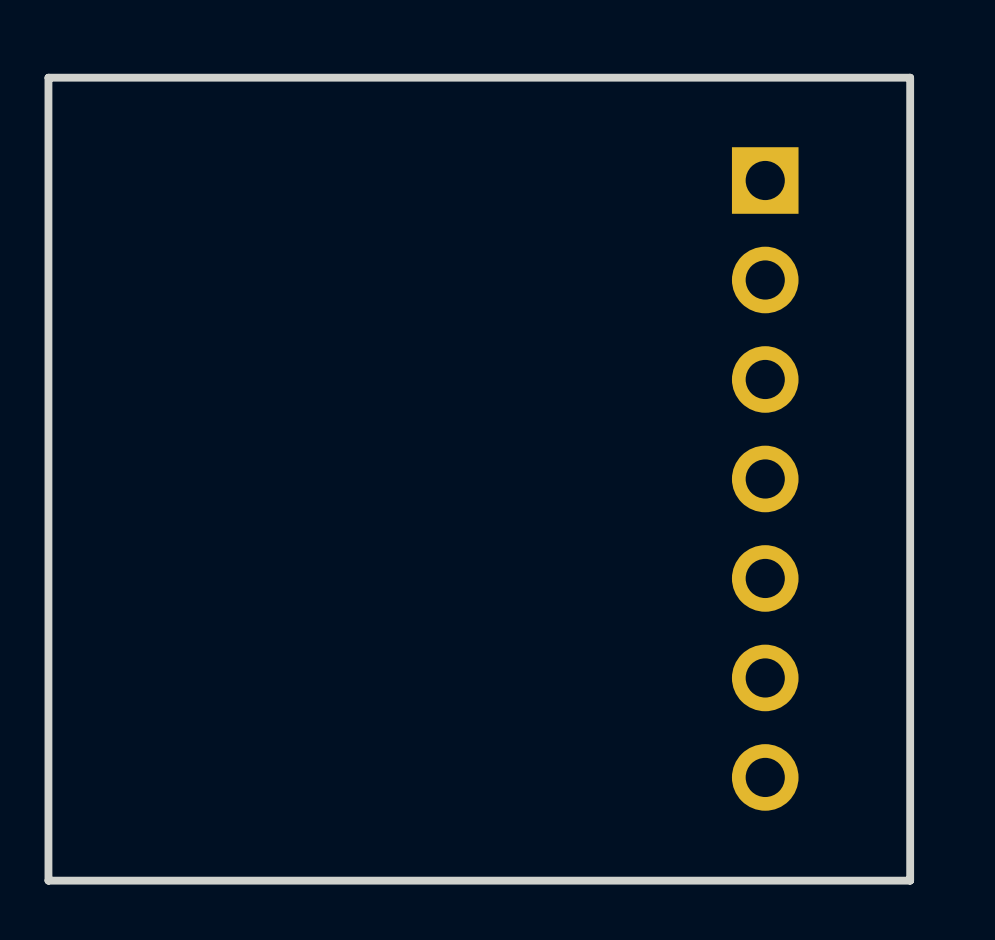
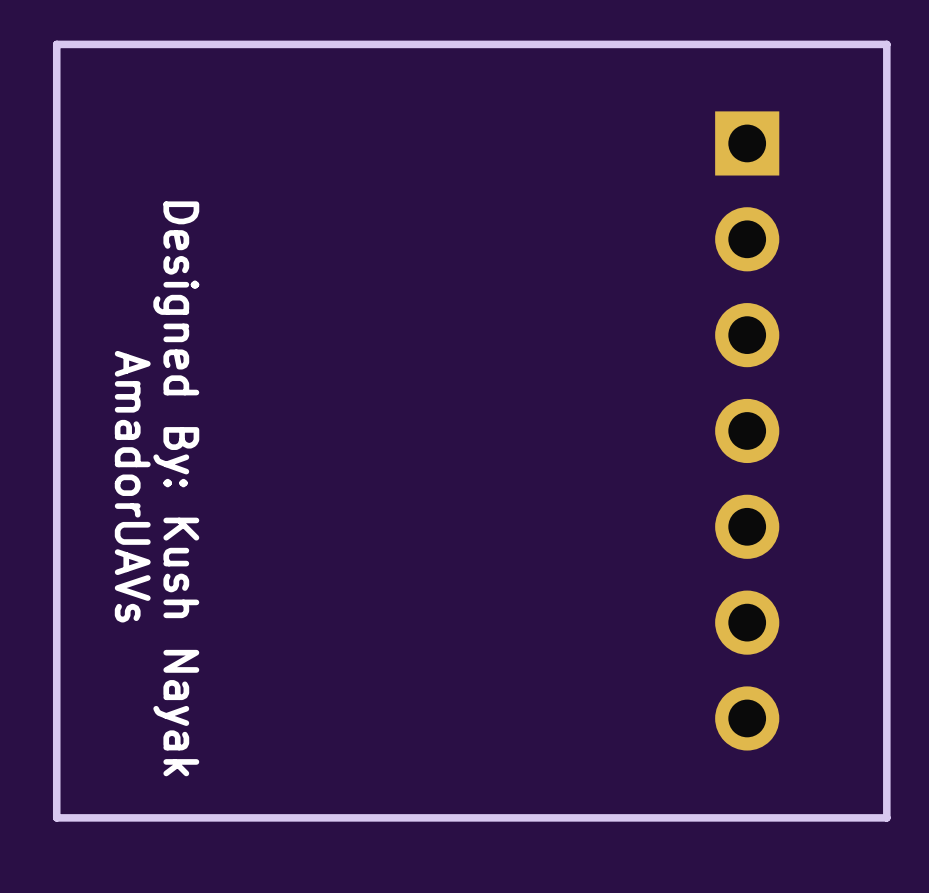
text: none -> AmadorUAVs (132, 486)
text: none -> Designed By: Kush Nayak (176, 488)

